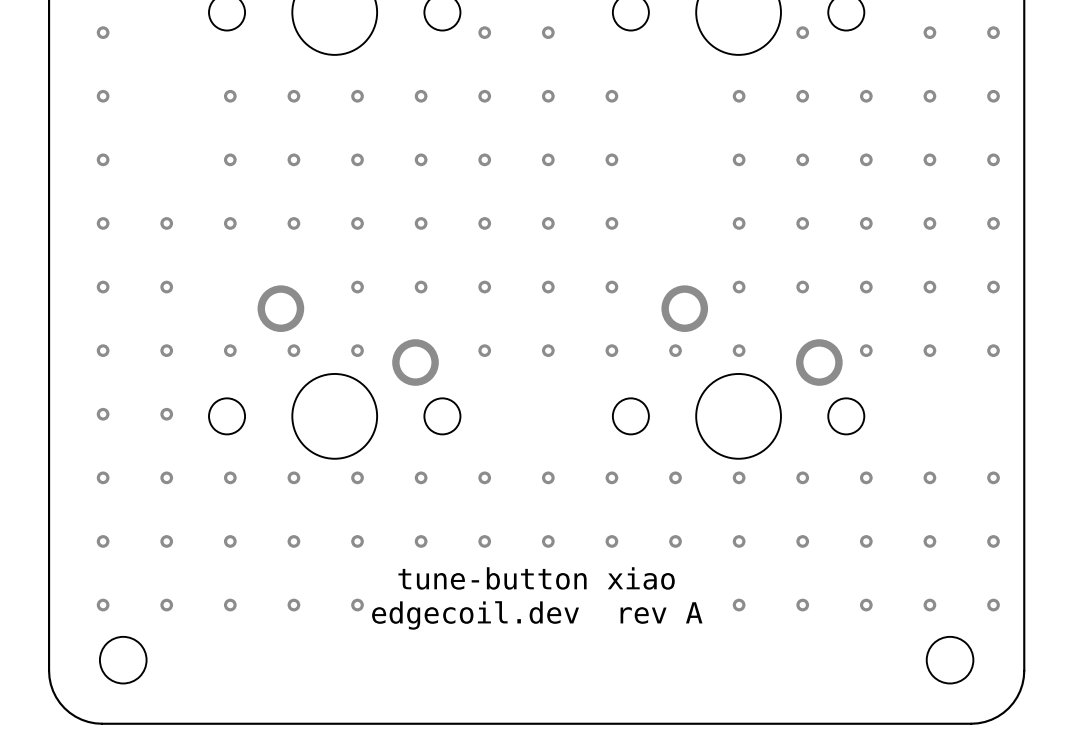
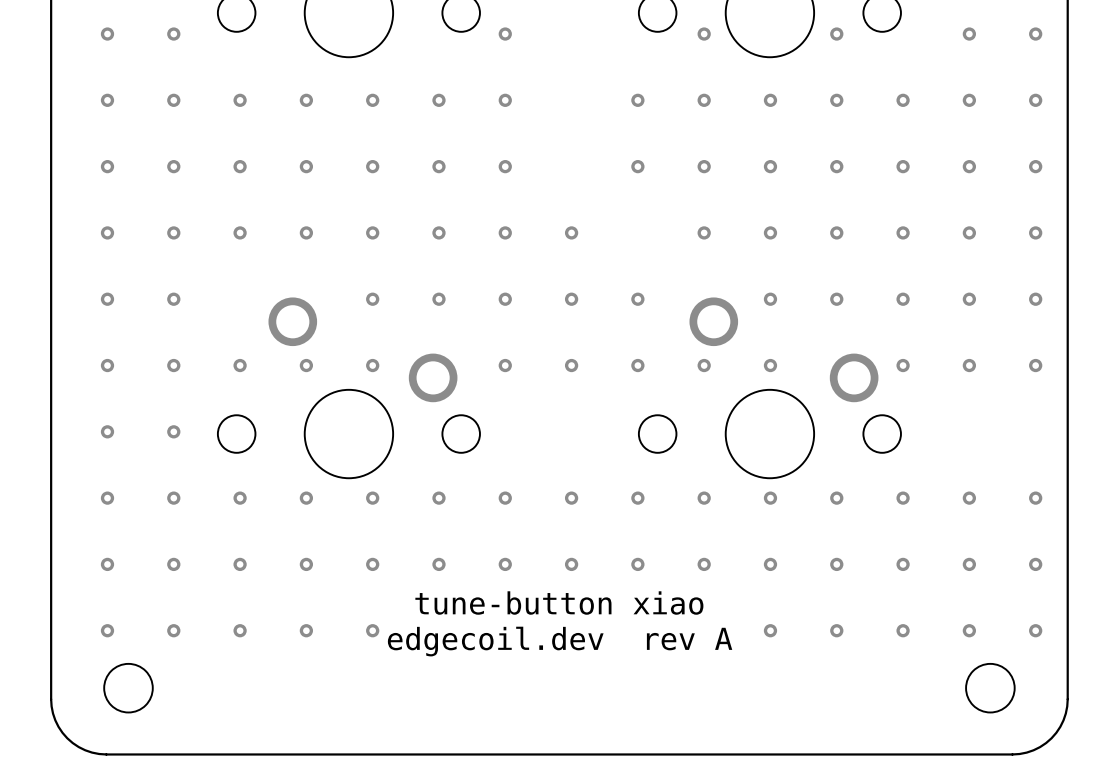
via: none -> (173, 34)
via: (548, 32) -> none
via: none -> (704, 34)
via: none -> (173, 100)
via: (548, 96) -> none
via: none -> (704, 100)
via: none -> (173, 166)
via: (548, 159) -> none
via: none -> (704, 166)
via: (611, 223) -> none
via: none -> (704, 232)

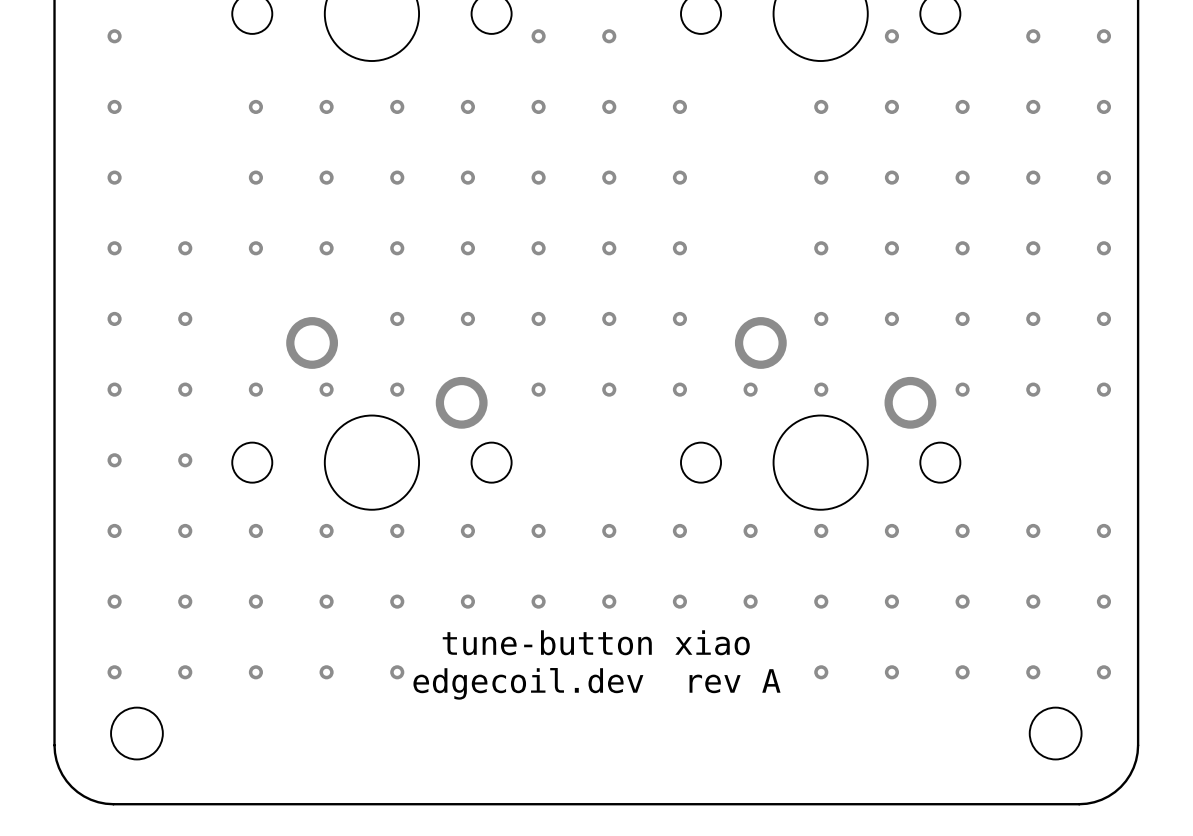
via: (173, 34) -> none
via: none -> (609, 36)
via: (704, 34) -> none
via: (173, 100) -> none
via: none -> (609, 106)
via: (704, 100) -> none
via: (173, 166) -> none
via: none -> (609, 177)
via: (704, 166) -> none
via: none -> (679, 248)
via: (704, 232) -> none

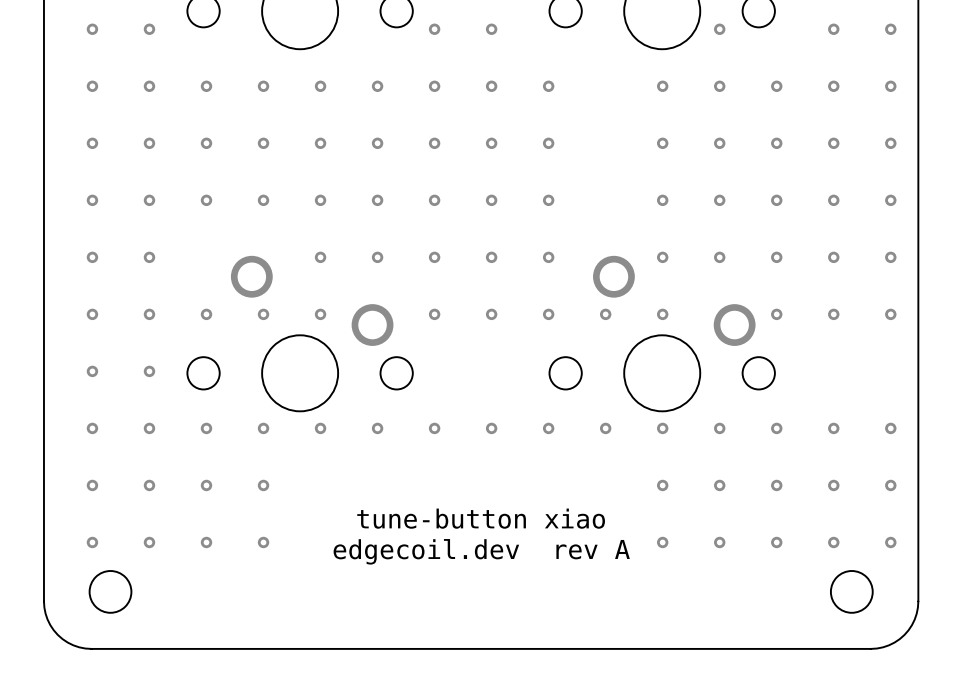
via: none -> (149, 29)
via: none -> (149, 86)
via: none -> (149, 143)
via: (397, 601) -> none
via: (467, 601) -> none
via: (538, 601) -> none
via: (609, 601) -> none
via: (679, 601) -> none
via: (750, 601) -> none
via: (397, 672) -> none

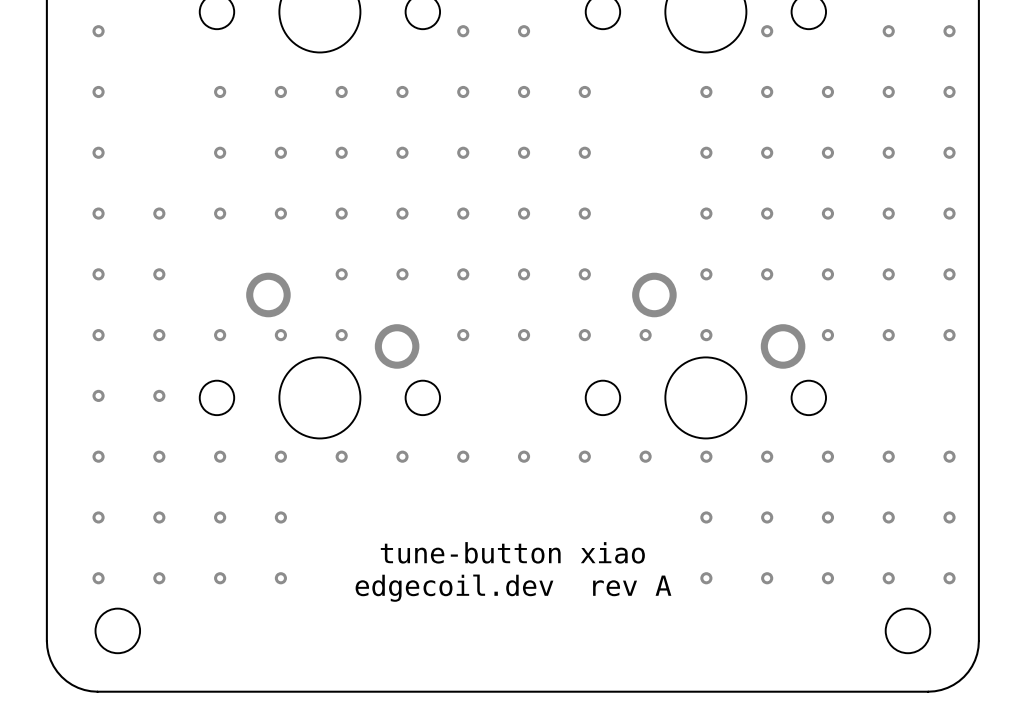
via: (149, 29) -> none
via: (149, 86) -> none
via: (149, 143) -> none

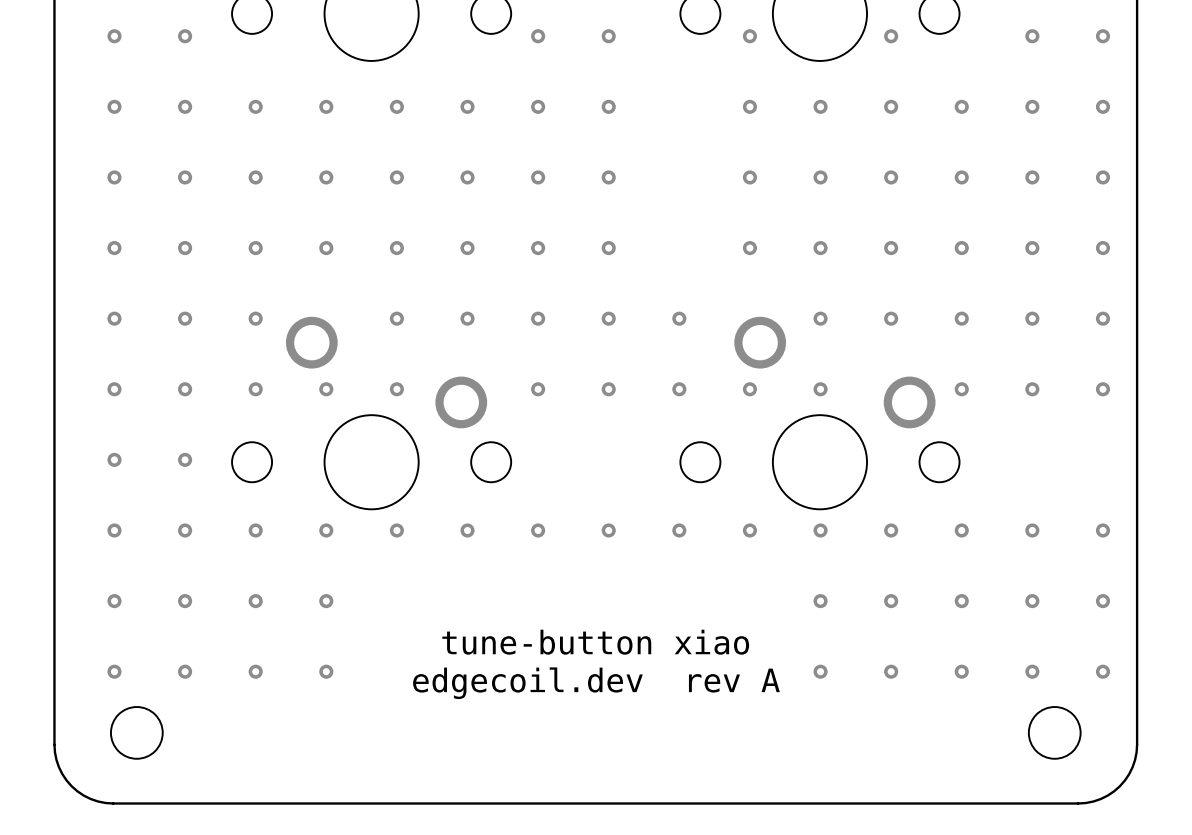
via: none -> (185, 36)
via: none -> (749, 36)
via: none -> (185, 106)
via: (584, 91) -> none
via: none -> (749, 106)
via: none -> (185, 177)
via: (584, 152) -> none
via: none -> (749, 177)
via: (584, 213) -> none
via: none -> (749, 248)
via: none -> (255, 318)

